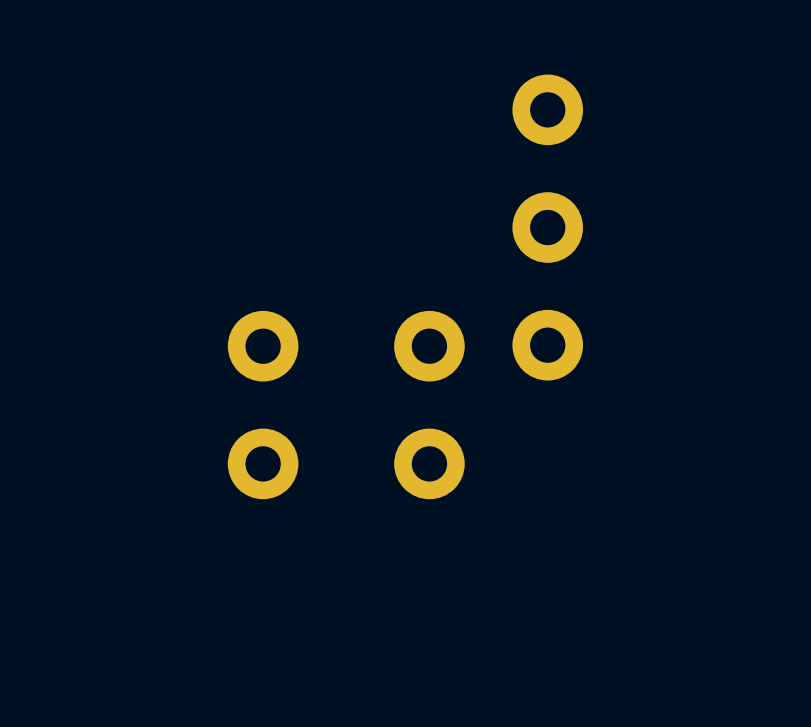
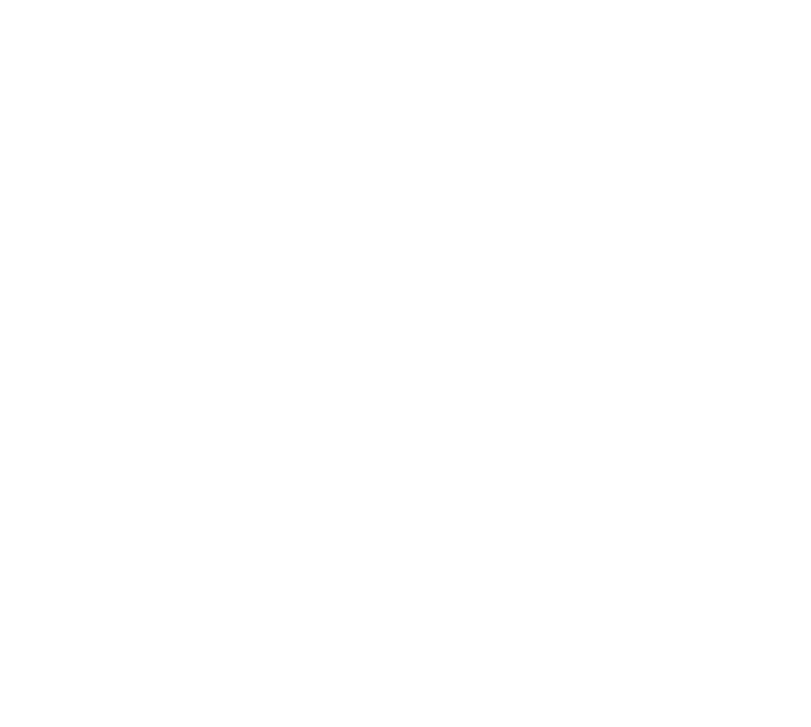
part: (547, 227) -> none
part: (263, 405) -> none
part: (429, 405) -> none

